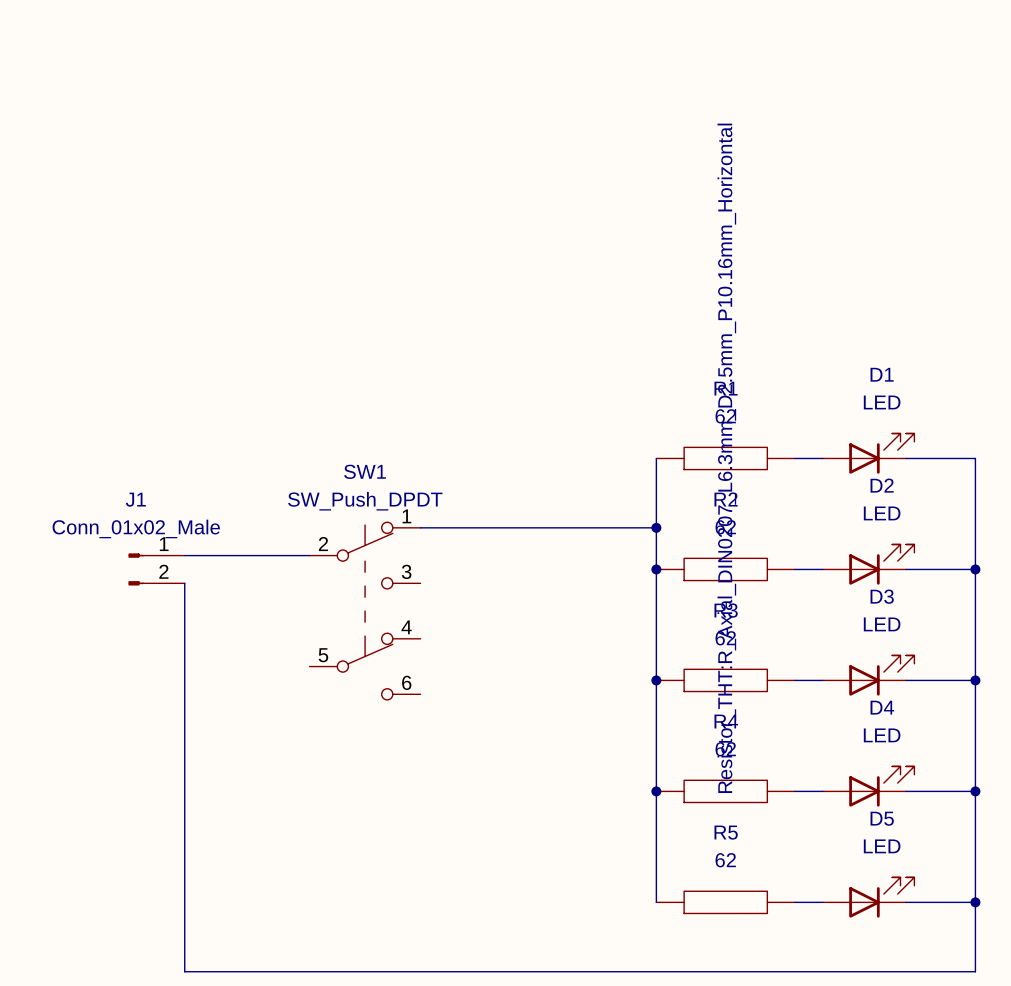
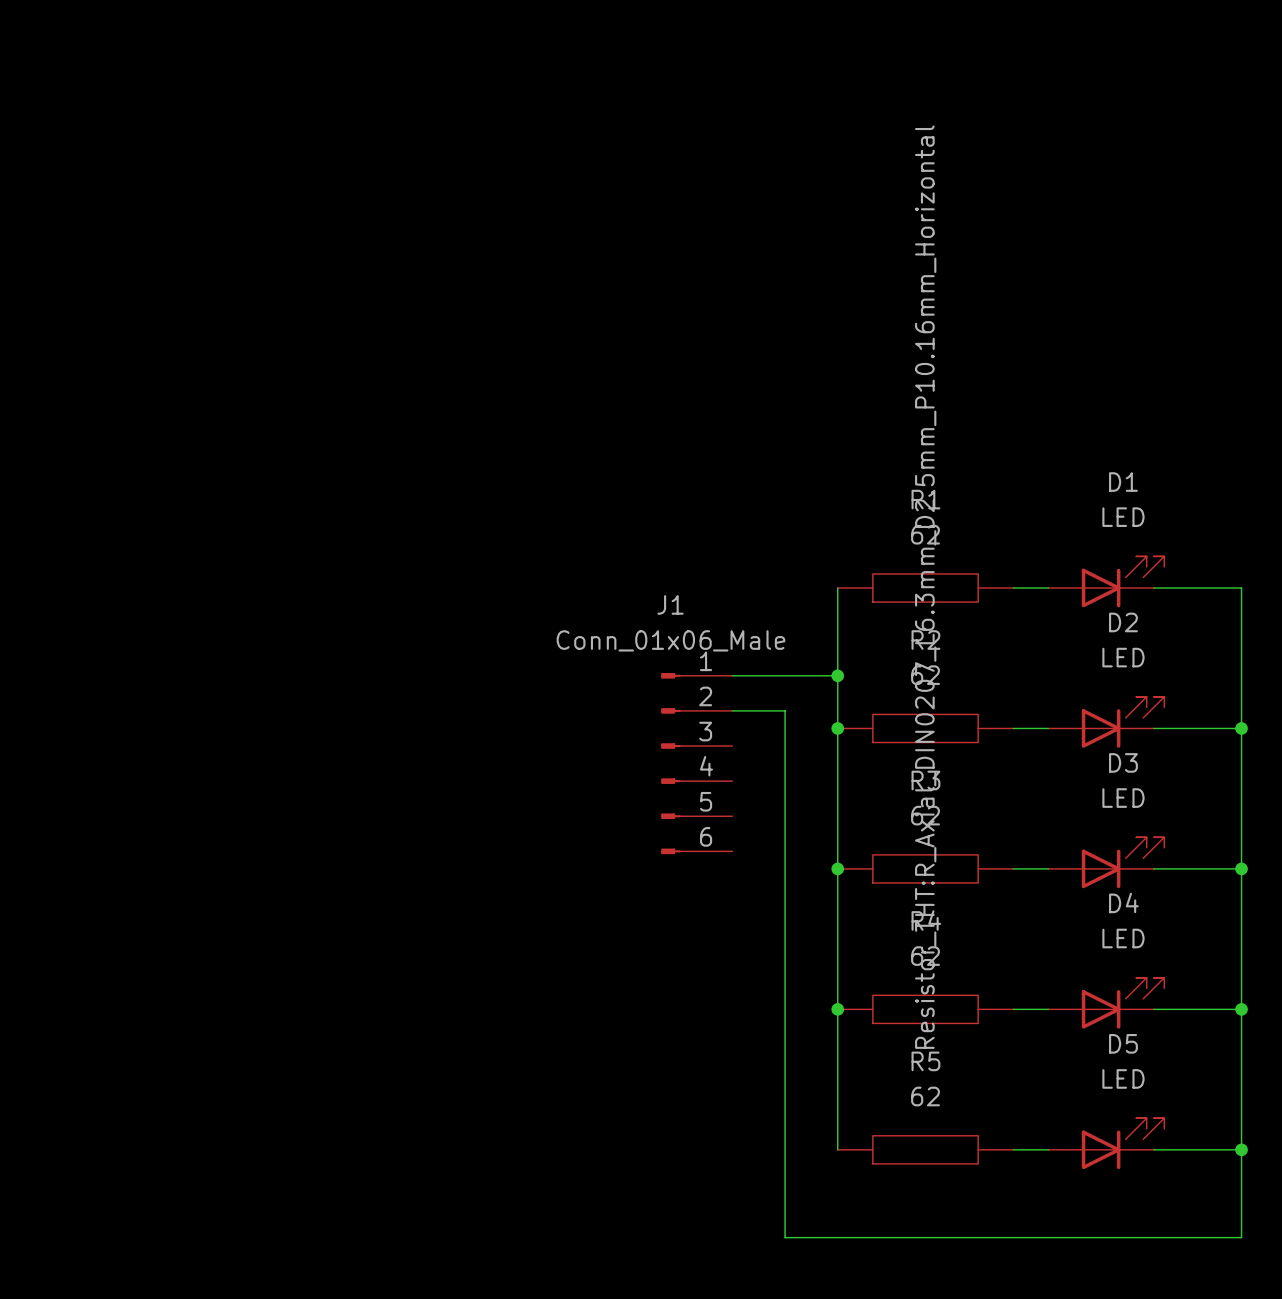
J1 name position: J1 (135, 499) -> J1 (670, 604)
wire: (420, 527) (573, 527) -> none
J1 value: Conn_01x02_Male (136, 528) -> Conn_01x06_Male (670, 640)
J1 symbol: [128, 553, 185, 586] -> [661, 672, 733, 855]
wire: (184, 555) (309, 555) -> none
wire: (184, 583) (184, 971) (614, 971) -> (732, 710) (785, 710) (785, 1237)
SW1: SW_Push_DPDT (365, 611) -> none

